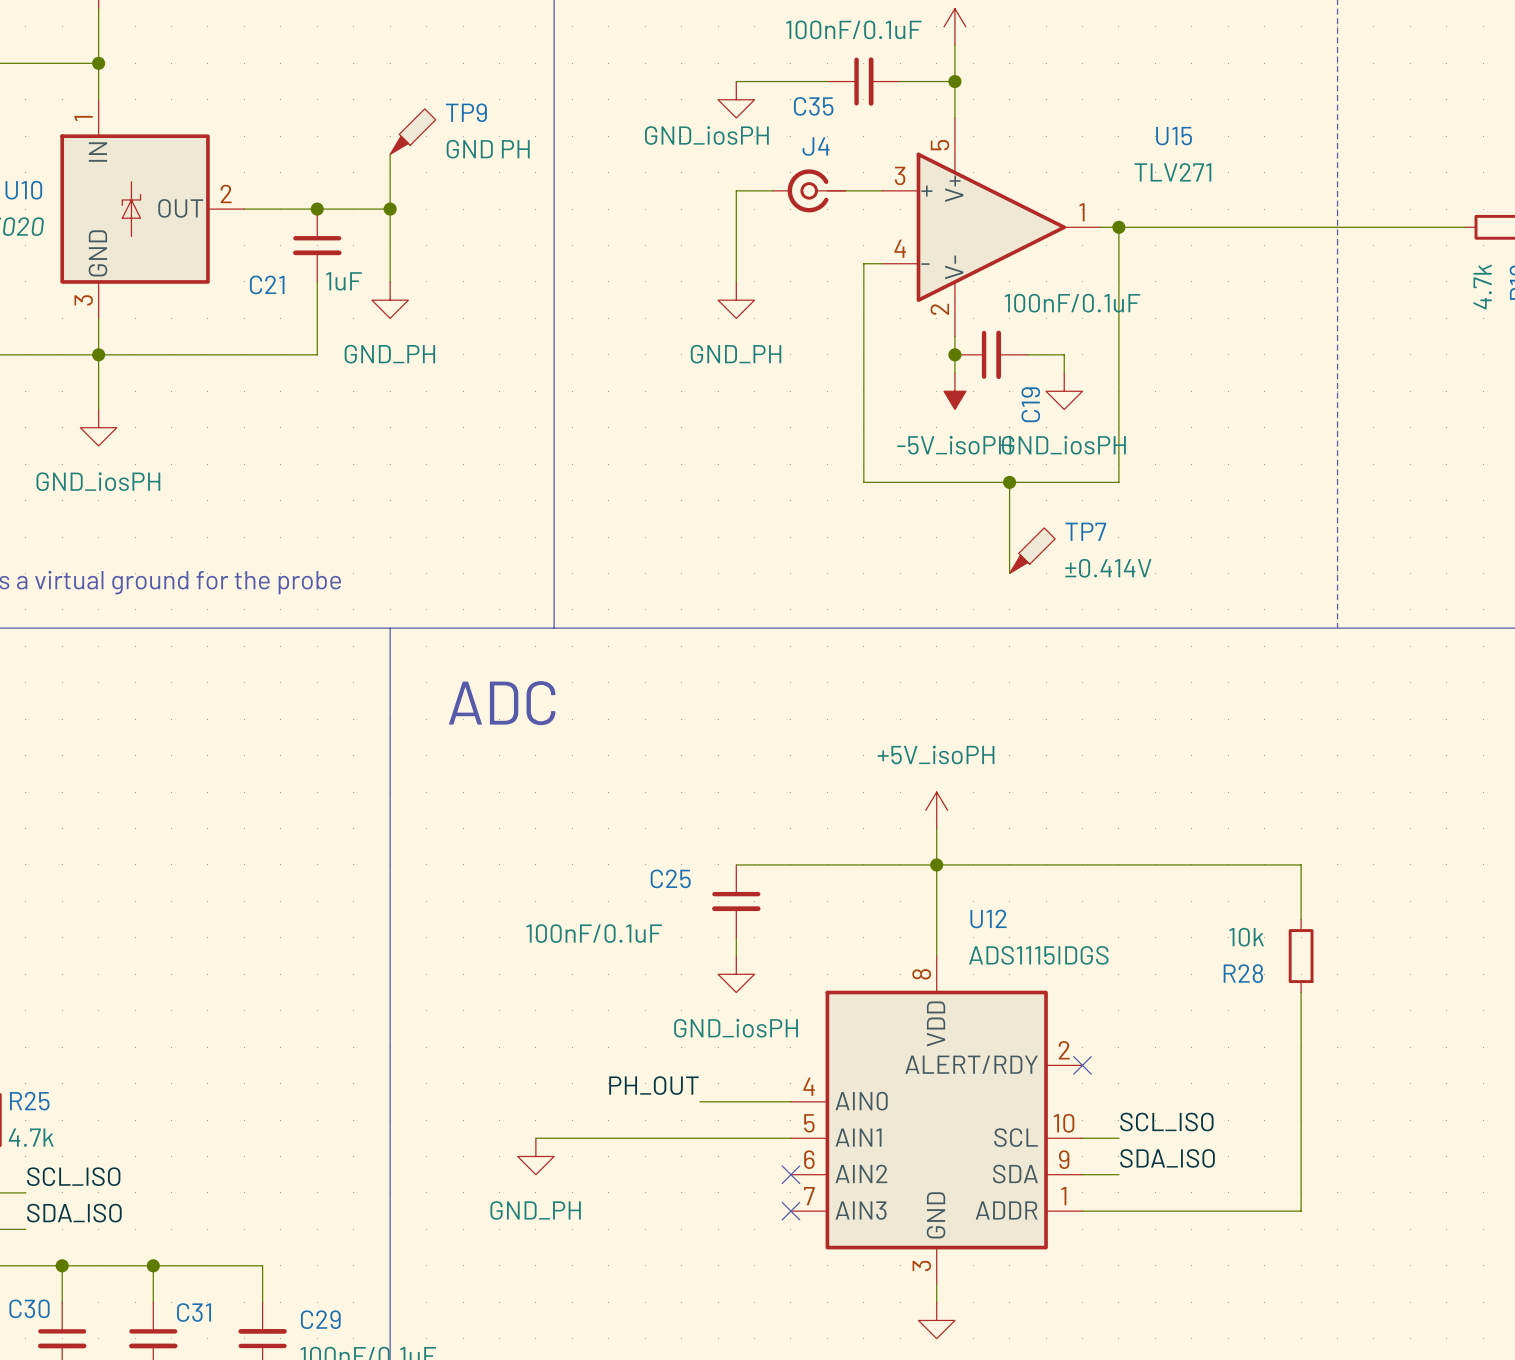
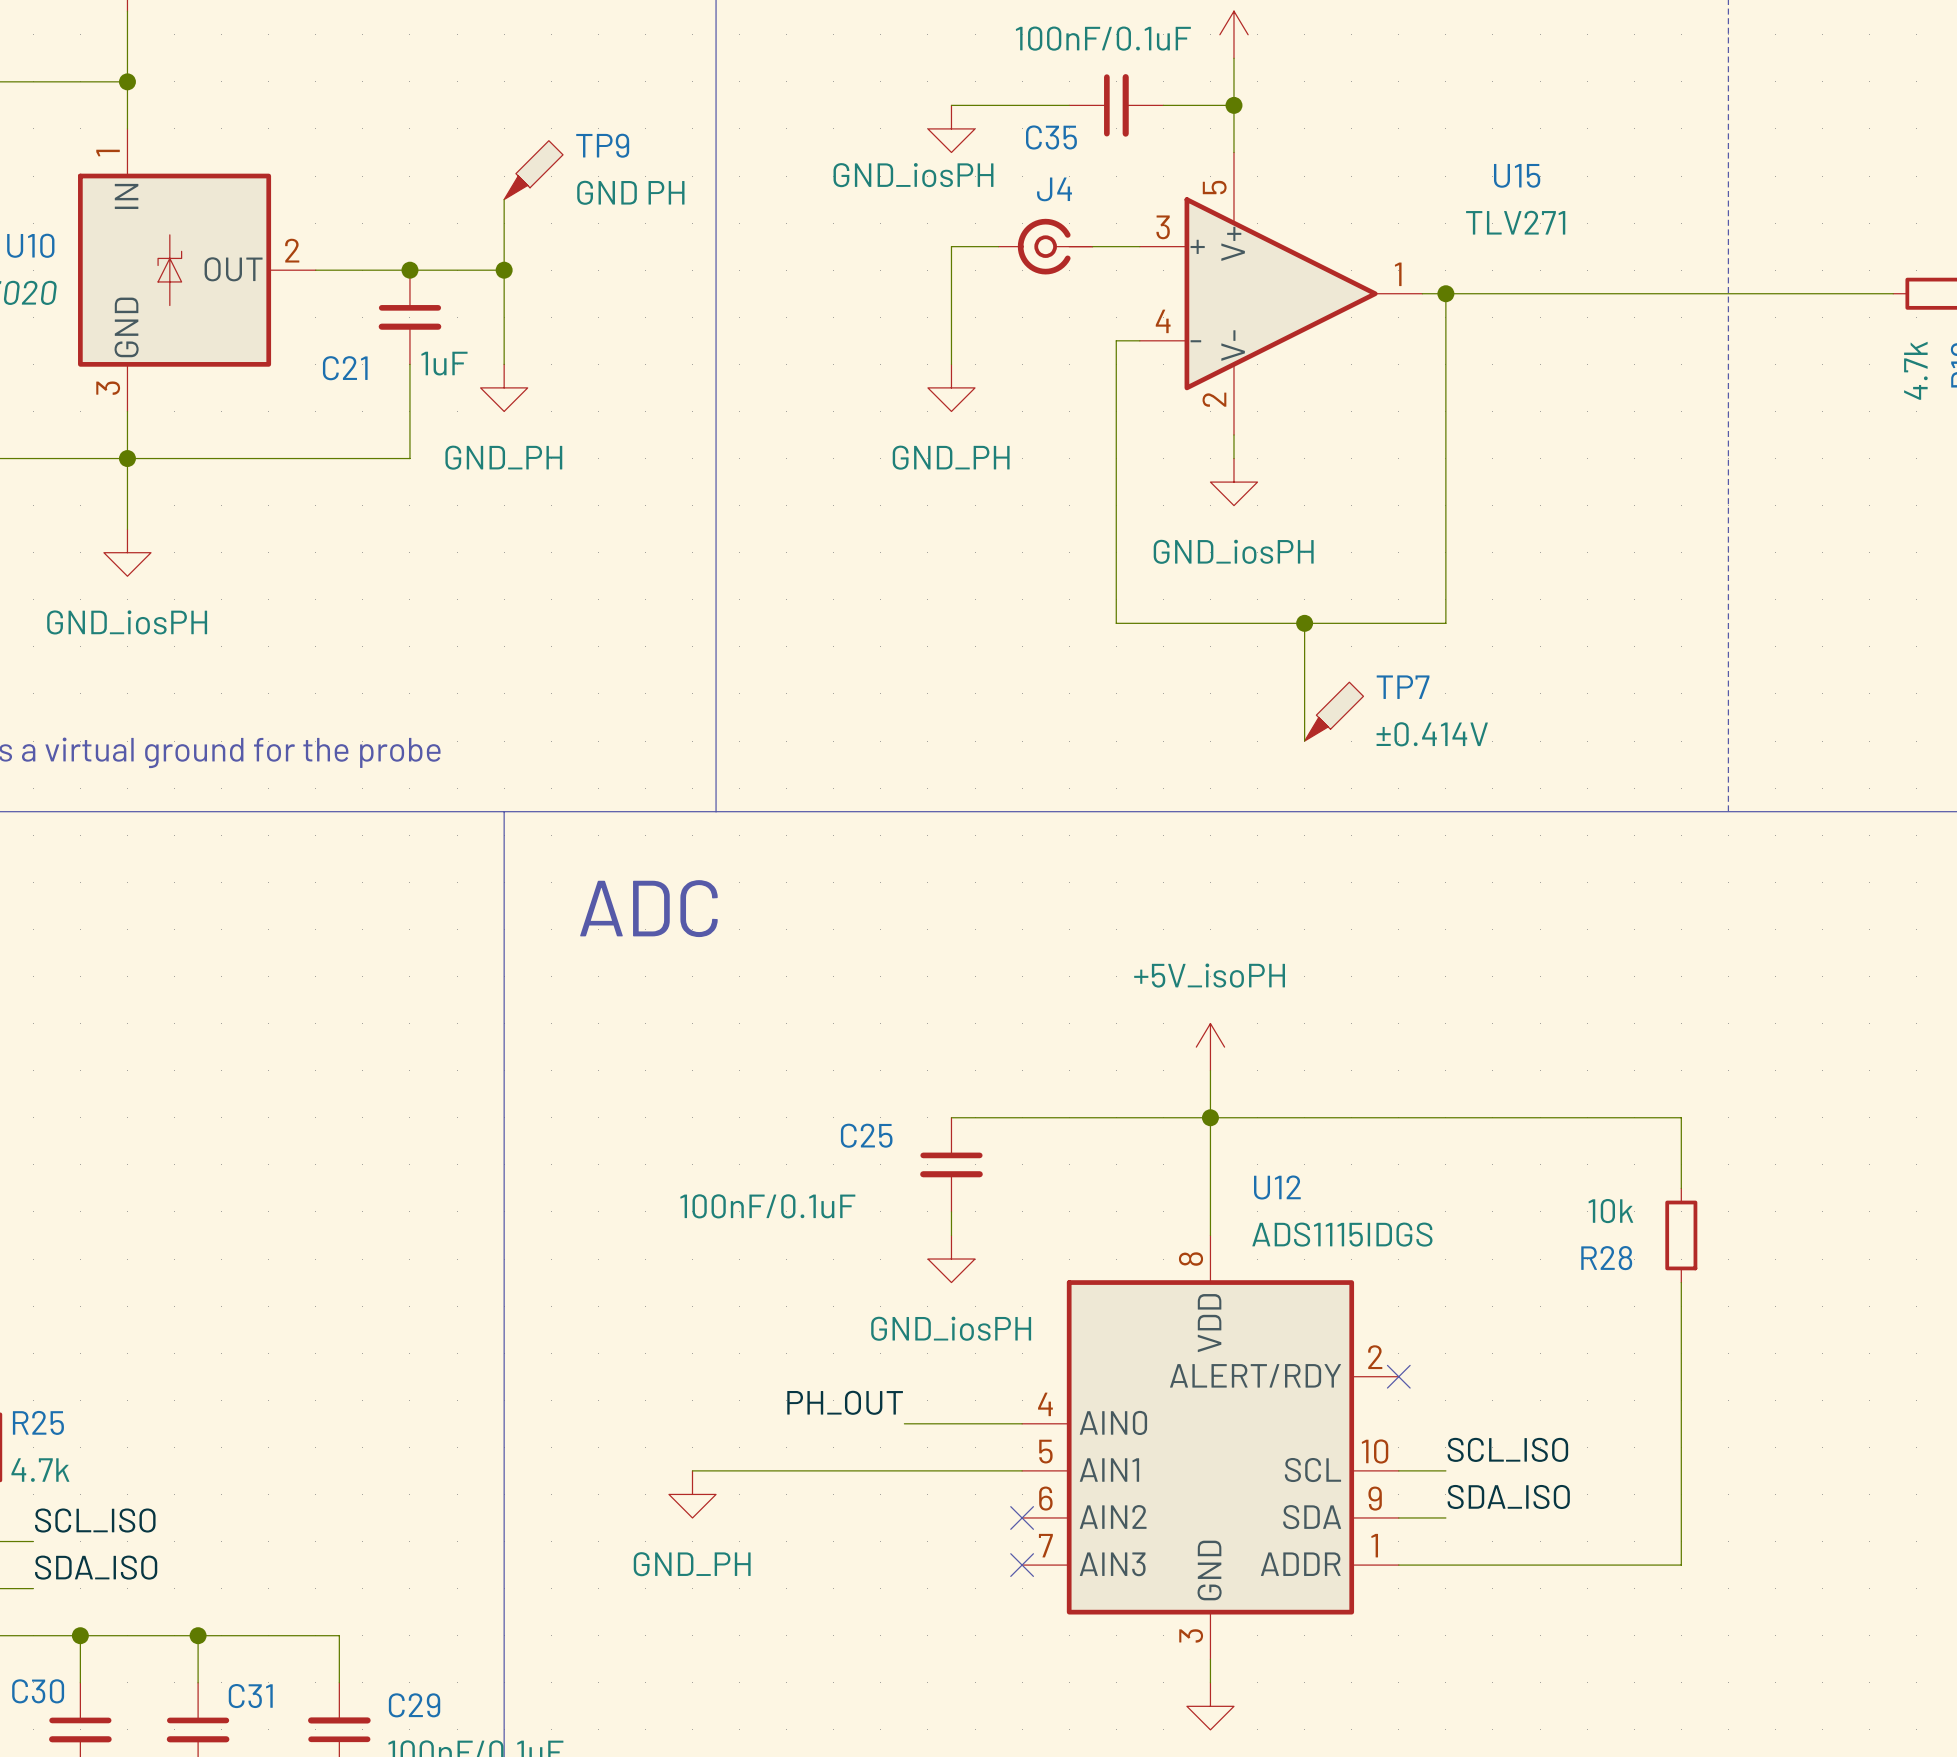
junction: (954, 354) -> none
C19: 100nF/0.1uF (991, 354) -> none
wire: (1027, 354) (1064, 354) (1064, 373) -> none
power symbol: -5V_isoPH (954, 391) -> none
power symbol position: GND_iosPH (1064, 391) -> GND_iosPH (1233, 482)

